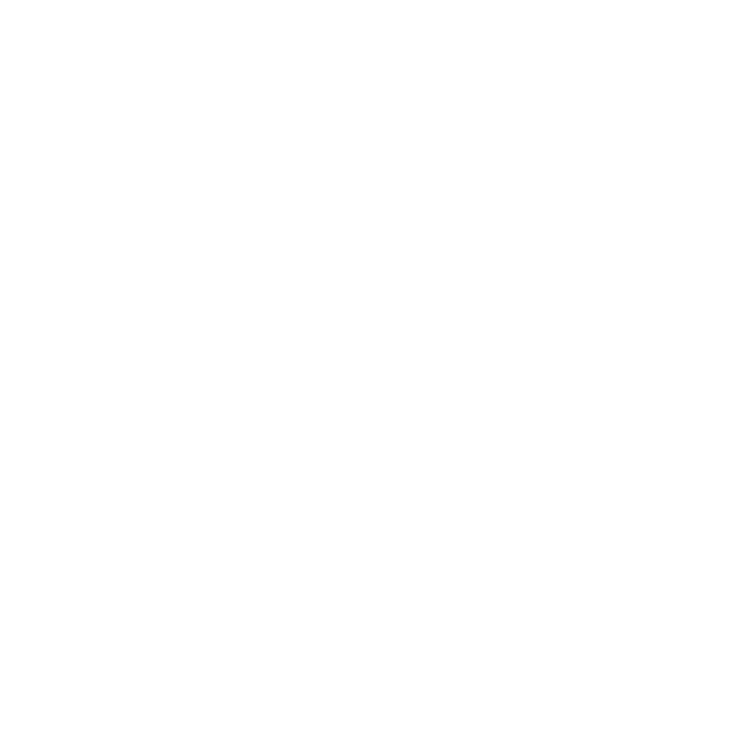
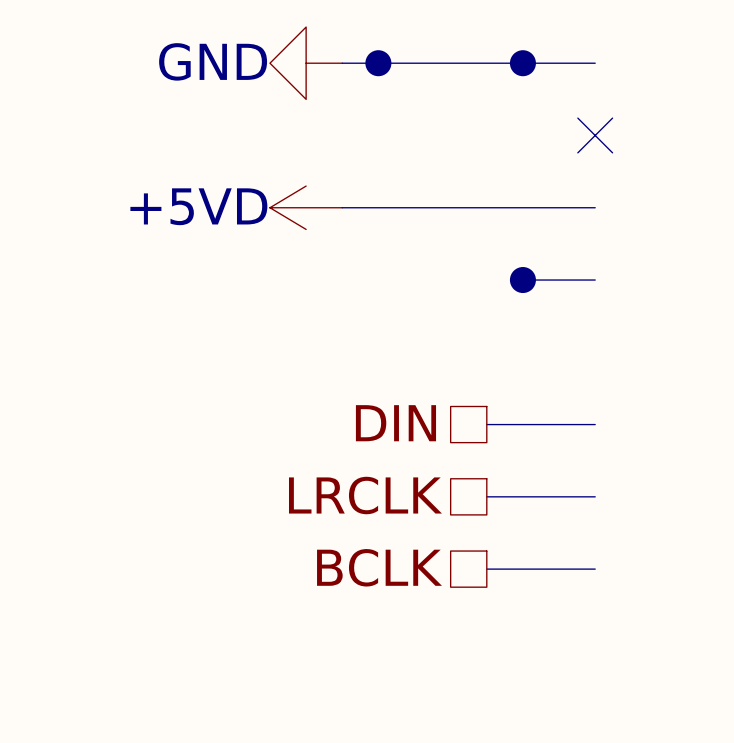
power symbol: none -> GND (306, 63)
wire: none -> (342, 63) (595, 63)
junction: none -> (378, 63)
junction: none -> (522, 63)
no-connect mark: none -> (595, 135)
power symbol: none -> +5VD (306, 207)
wire: none -> (342, 207) (595, 207)
wire: none -> (522, 280) (595, 280)
junction: none -> (522, 280)
hierarchical label: none -> DIN (395, 423)
wire: none -> (486, 424) (595, 424)
hierarchical label: none -> LRCLK (365, 495)
wire: none -> (486, 496) (595, 496)
hierarchical label: none -> BCLK (379, 567)
wire: none -> (486, 569) (595, 569)

